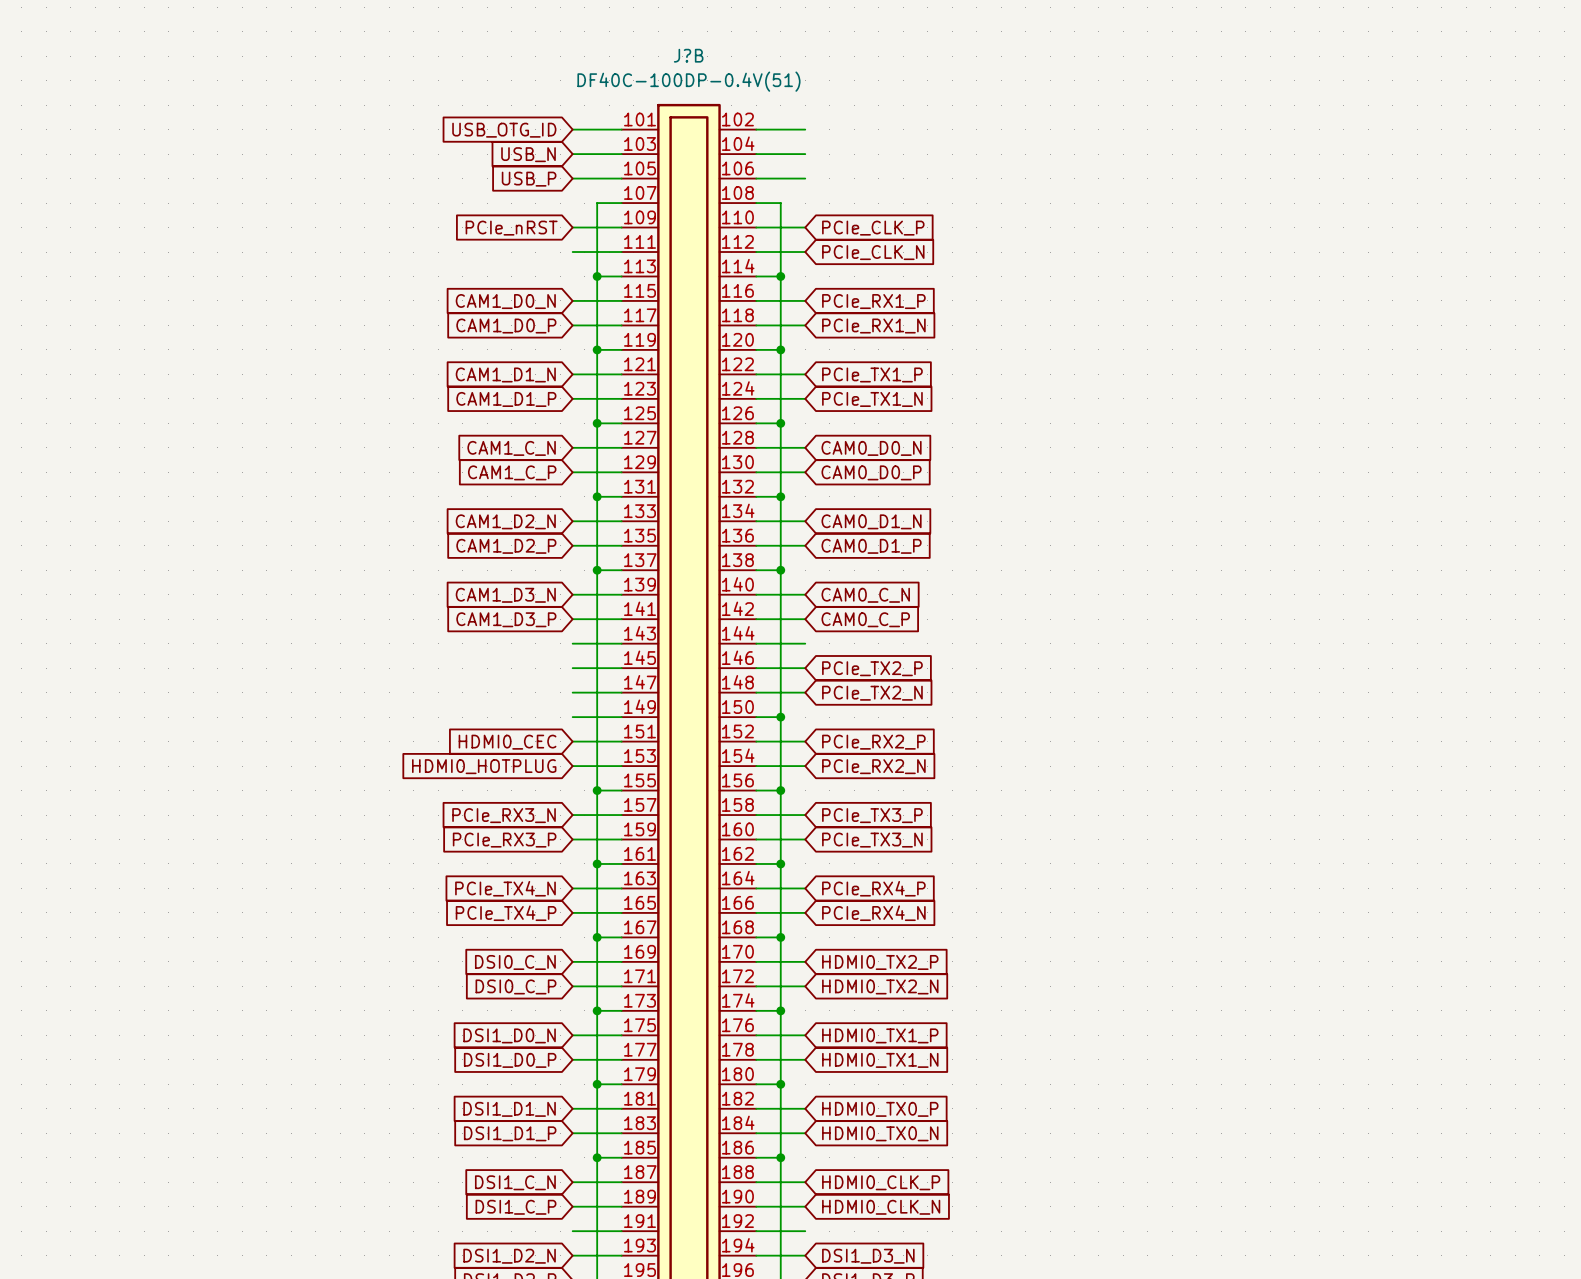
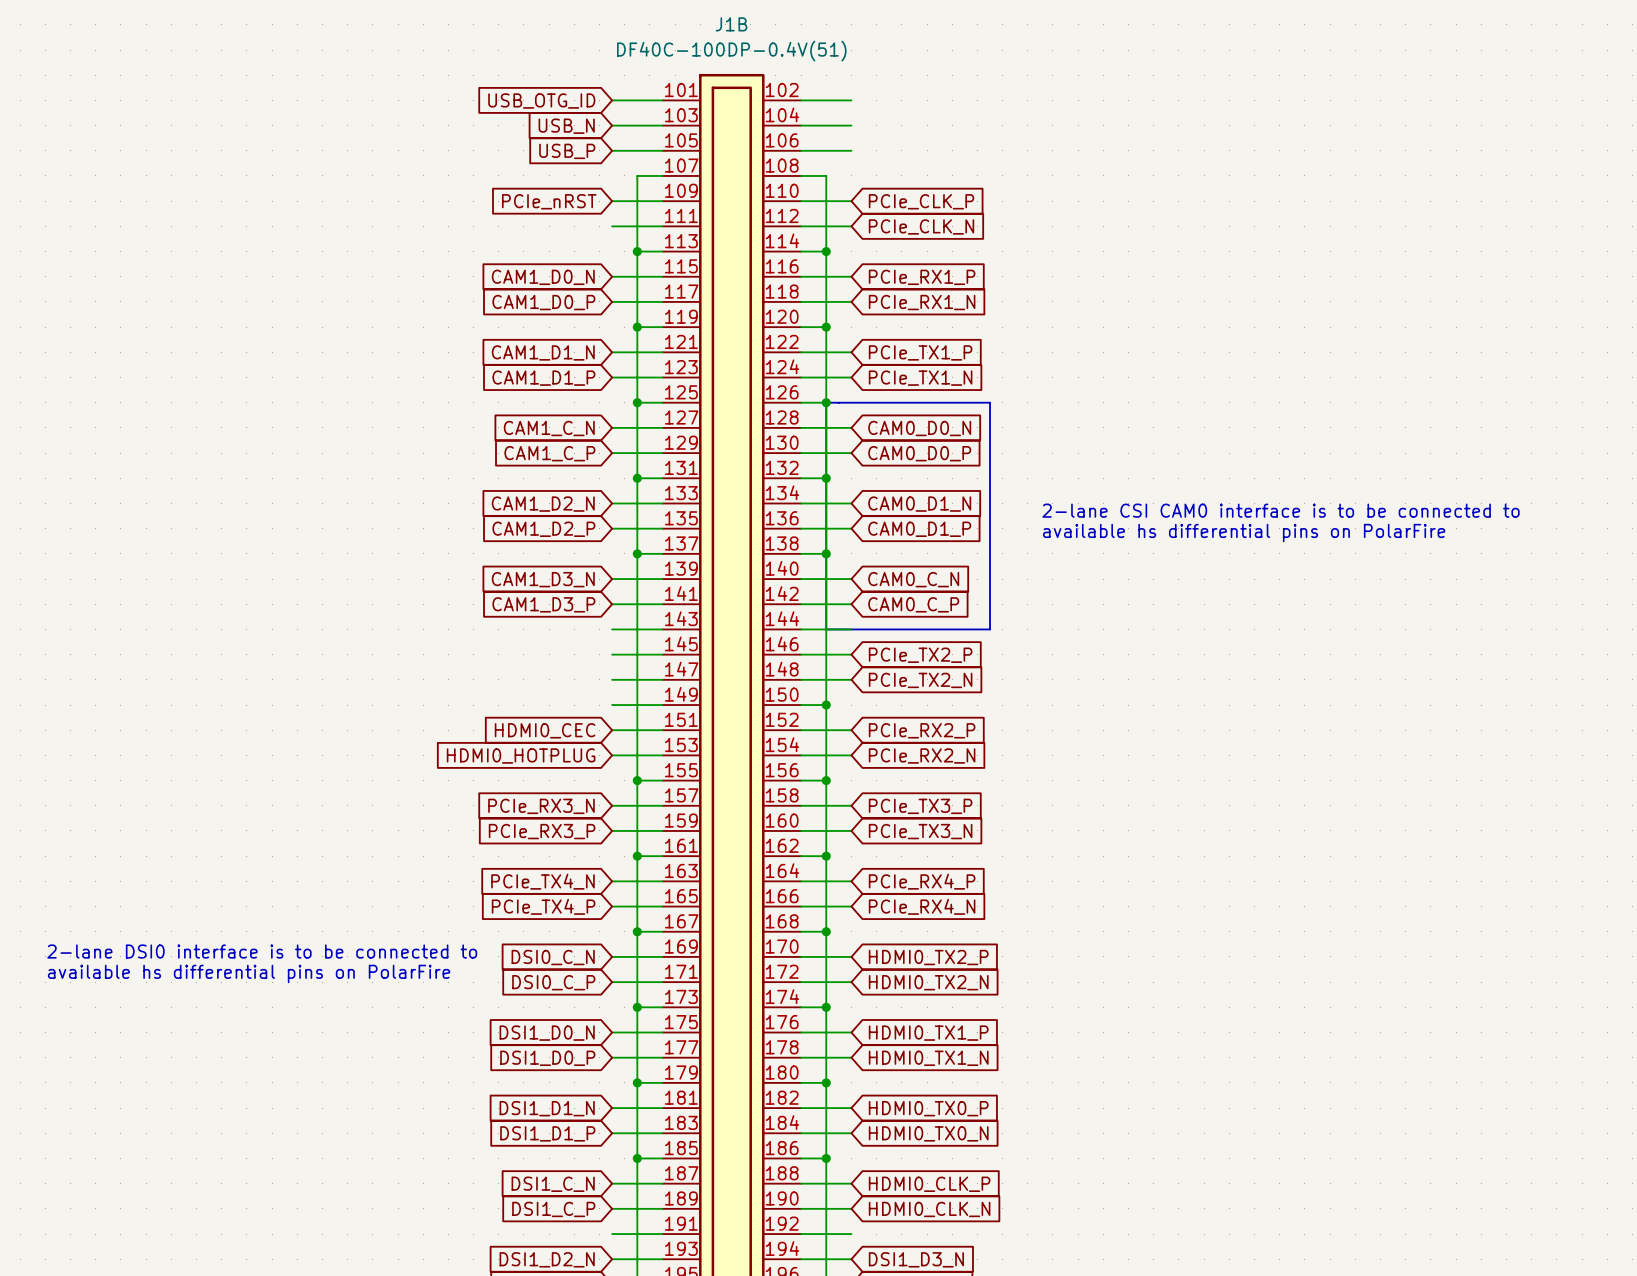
J?B name: J?B (688, 55) -> J1B (731, 24)
line: none -> (826, 402) (990, 402) (990, 629) (826, 629) (826, 402)
text: none -> 2-lane CSI CAM0 interface is to be connected to (1281, 510)
text: none -> available hs differential pins on PolarFire (1244, 533)
text: none -> 2-lane DSI0 interface is to be connected to (262, 951)
text: none -> available hs differential pins on PolarFire (249, 973)

